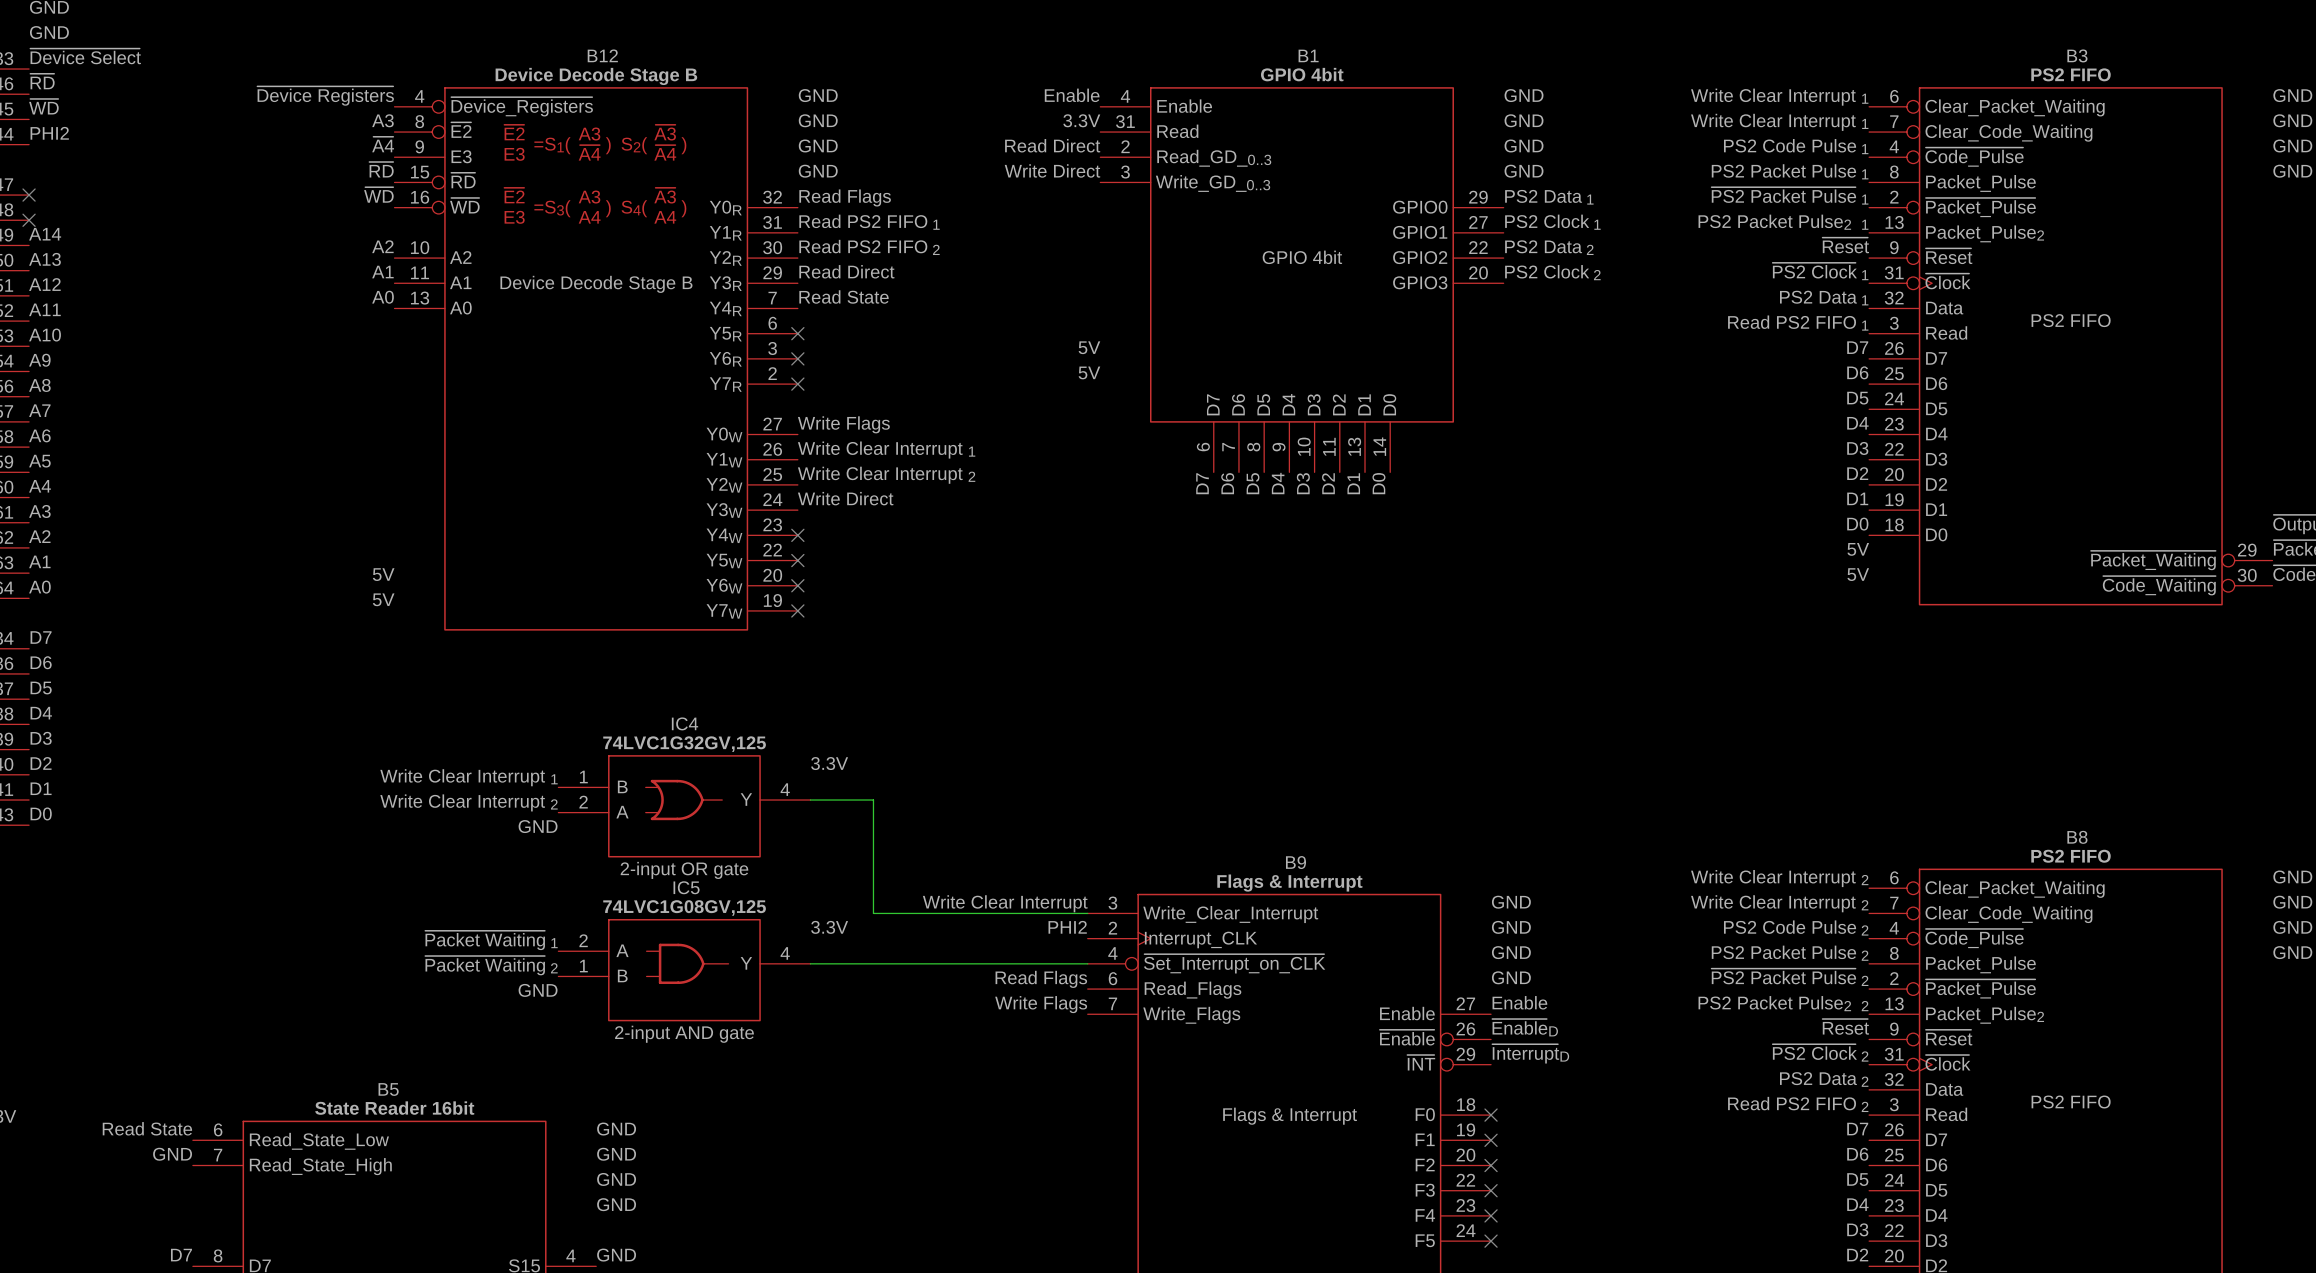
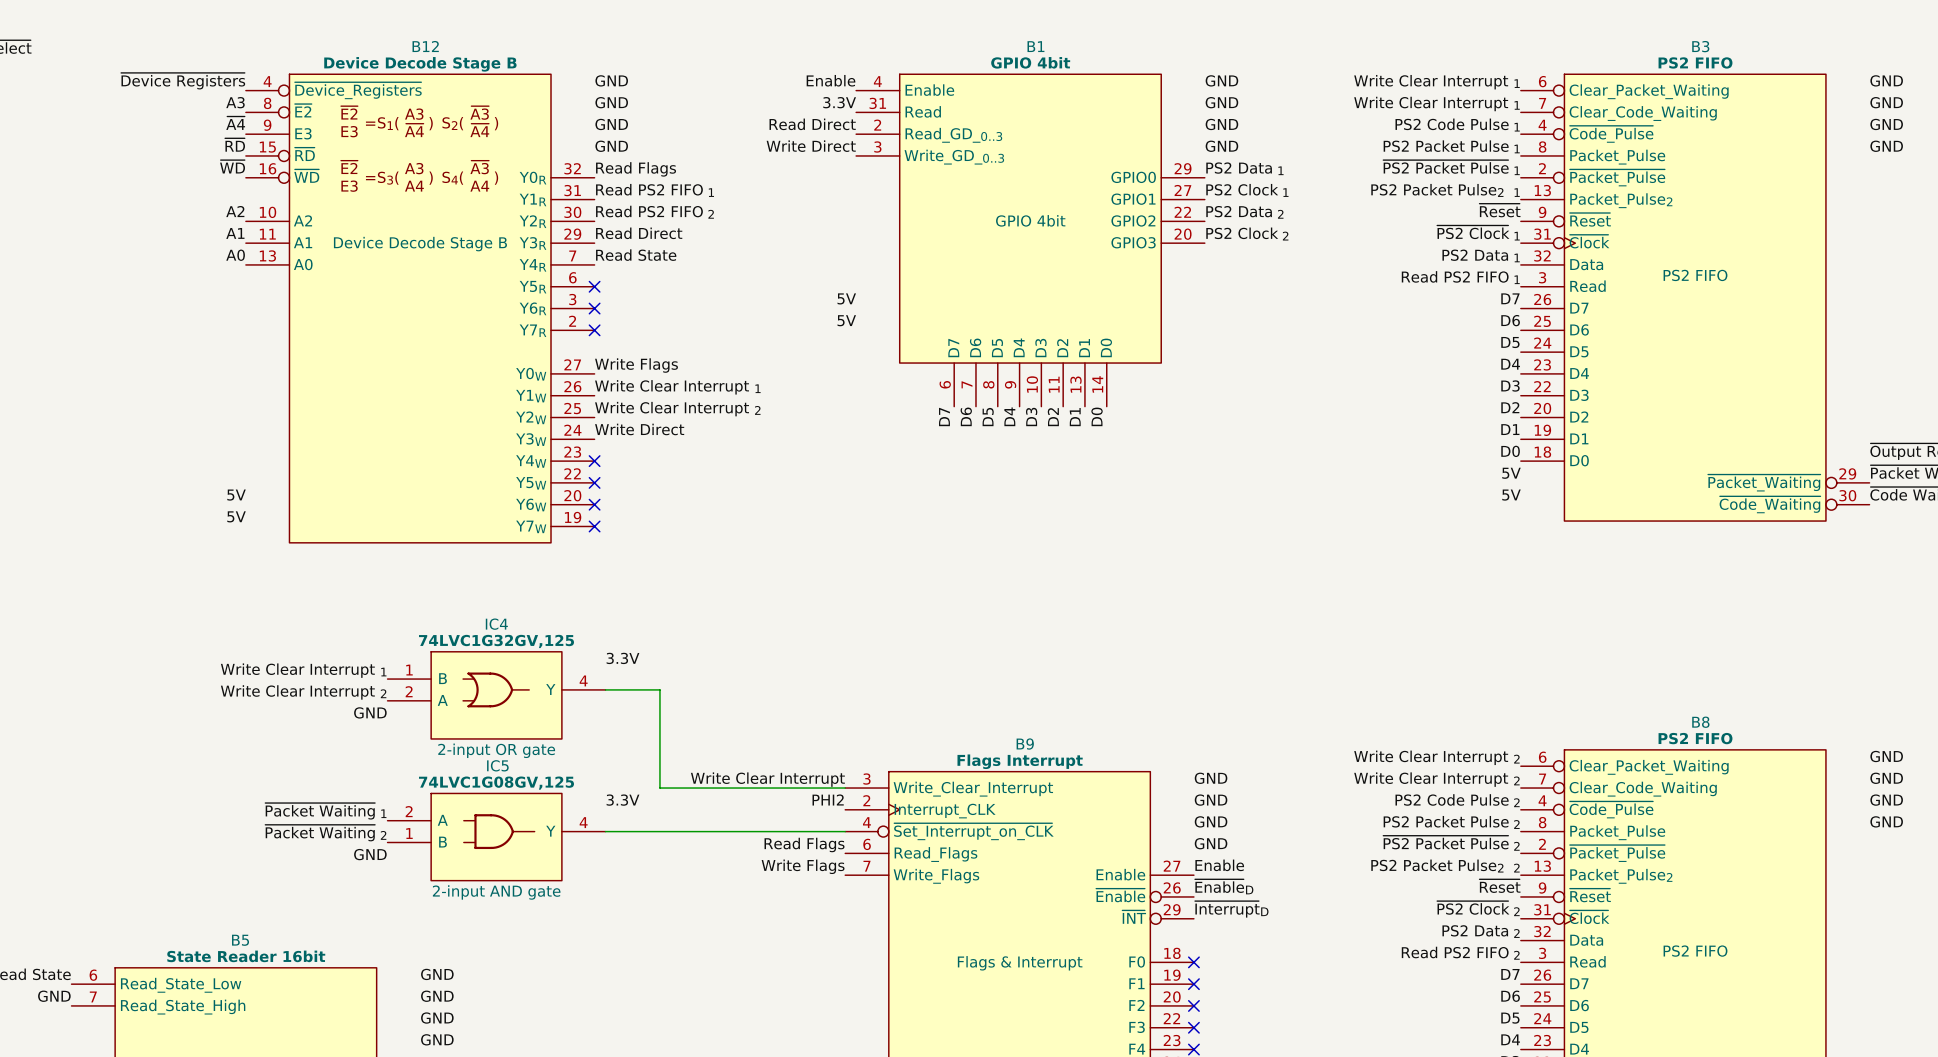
B9 value: Flags & Interrupt (1289, 883) -> Flags Interrupt (1020, 761)

